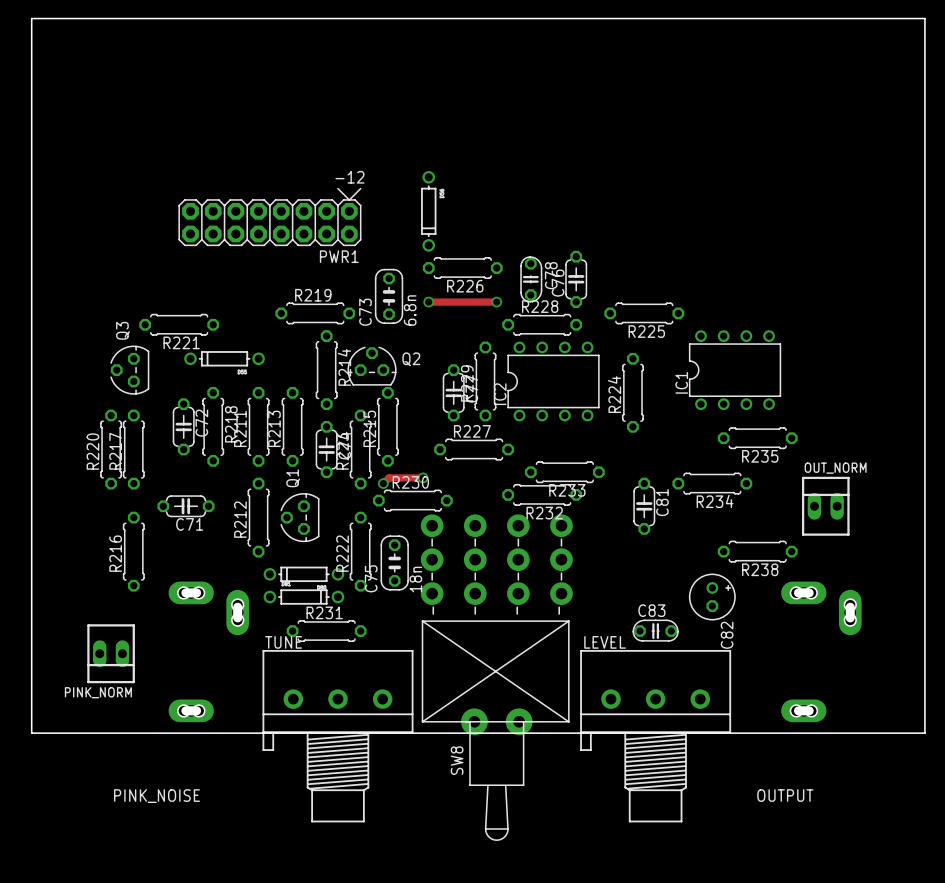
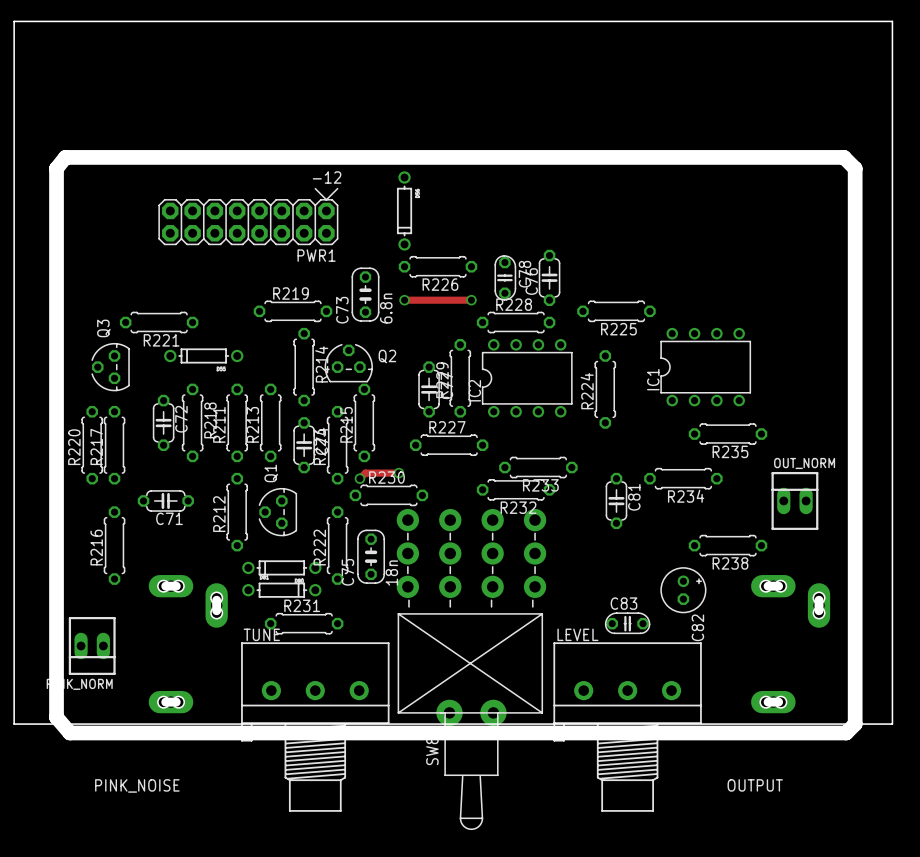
board edge: none -> (65, 157) (844, 157) (855, 168) (855, 724) (846, 732) (69, 732) (56, 717) (56, 168) (65, 157)

